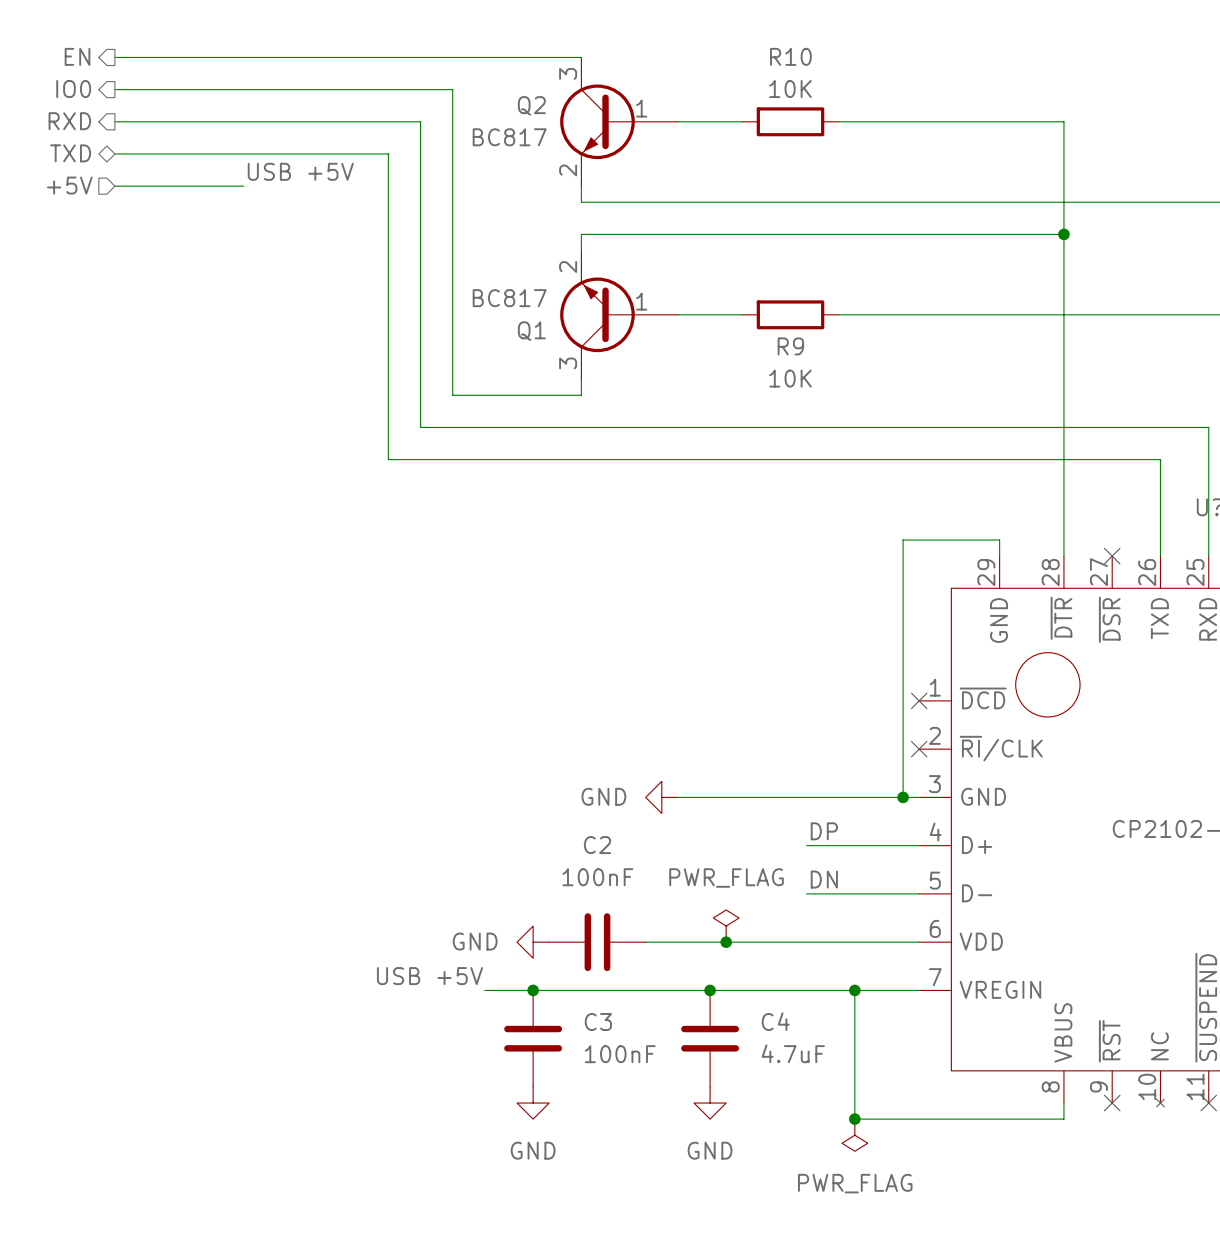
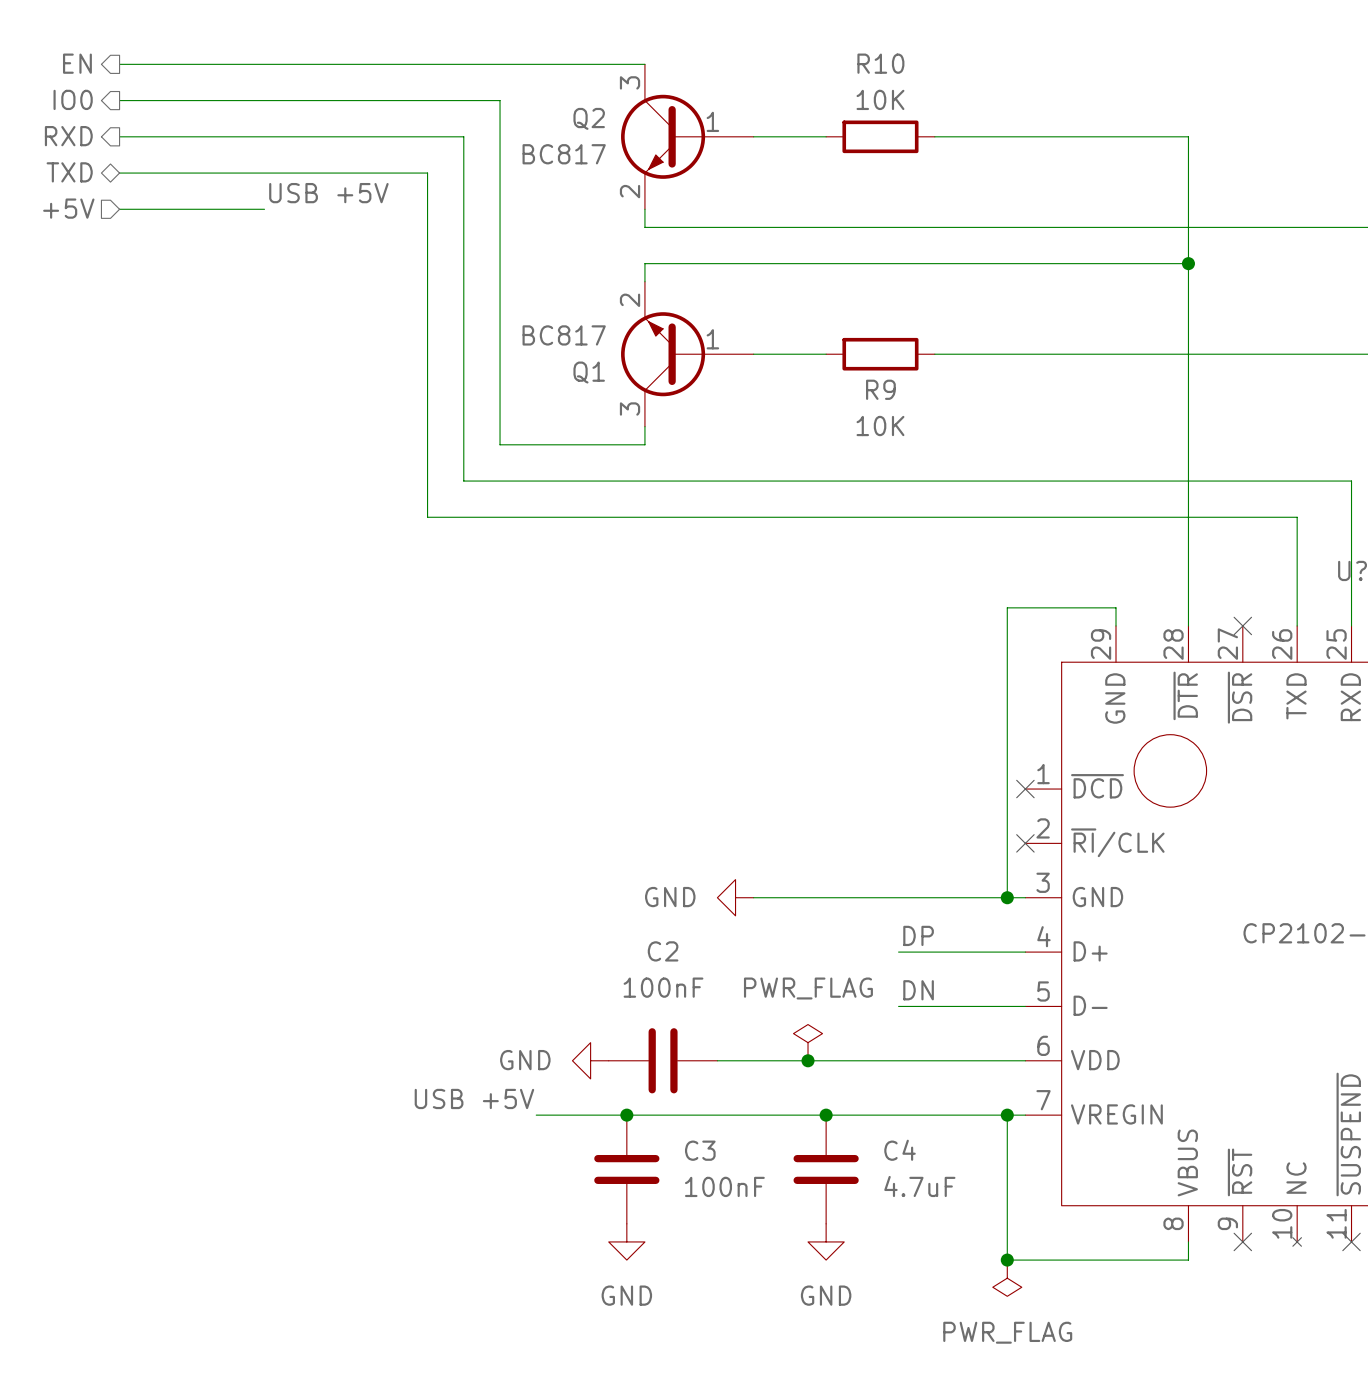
junction position: (533, 990) -> (626, 1115)
junction position: (710, 990) -> (826, 1115)
wire: (854, 990) (854, 1119) (903, 1119) -> (1007, 1115) (1007, 1260)
junction position: (854, 990) -> (1007, 1115)
C3 position: (533, 1038) -> (626, 1169)
C4 position: (710, 1038) -> (826, 1169)
power symbol position: GND (533, 1103) -> GND (626, 1241)
power symbol position: GND (710, 1103) -> GND (826, 1241)
junction position: (854, 1119) -> (1007, 1260)
power symbol position: PWR_FLAG (854, 1135) -> PWR_FLAG (1007, 1278)

